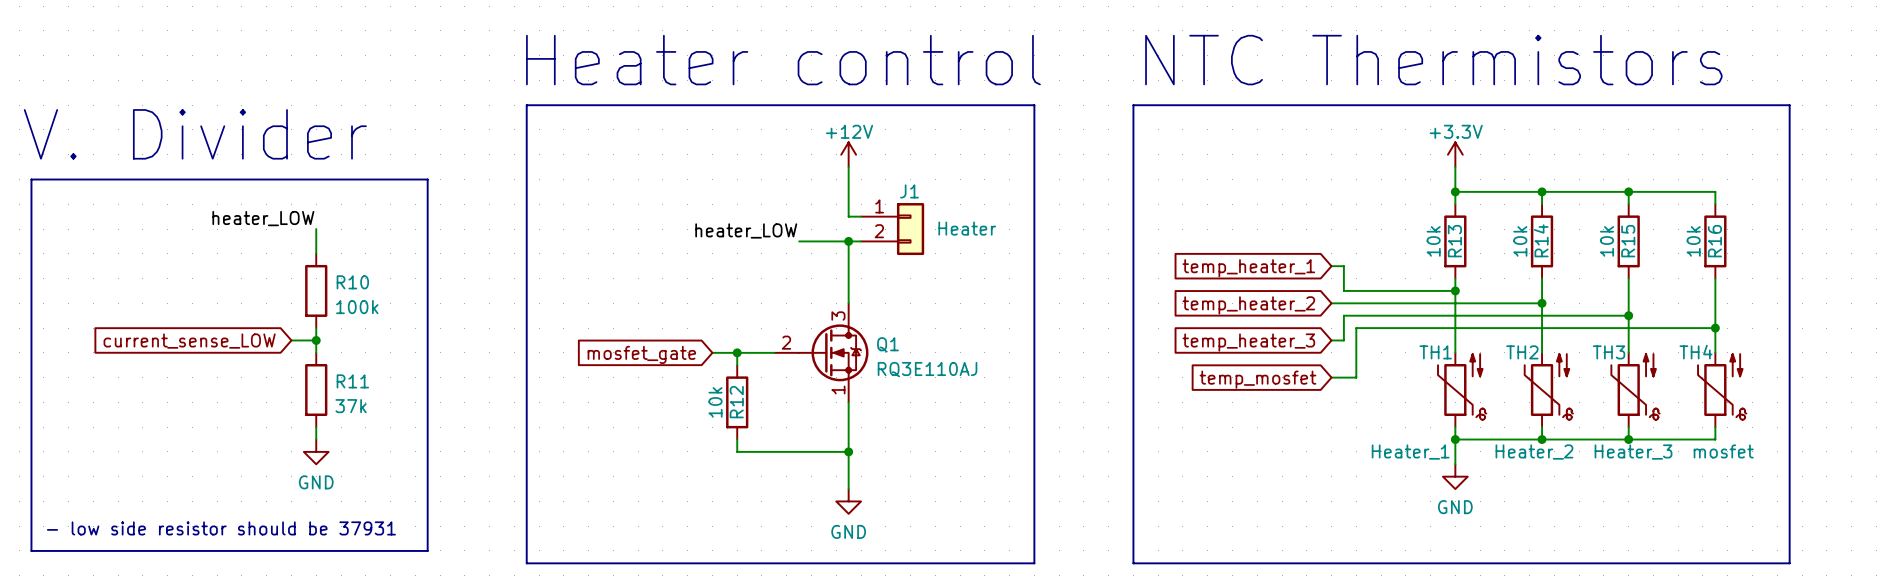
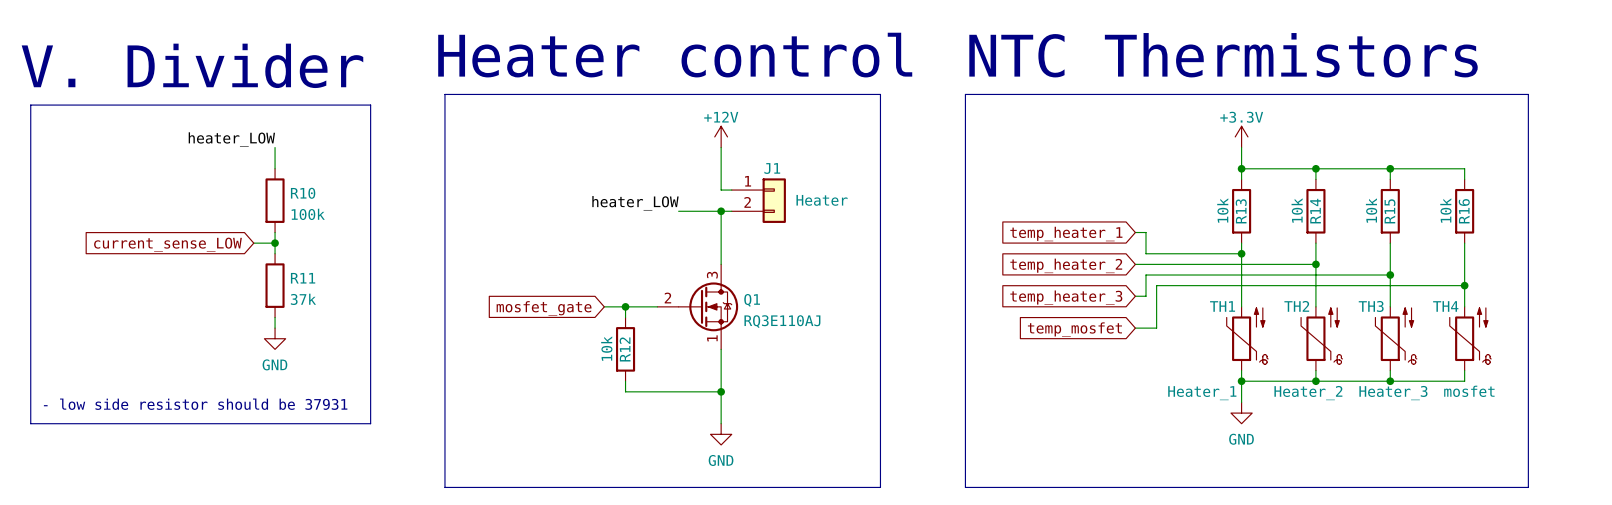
text position: V. Divider (195, 134) -> V. Divider (192, 65)
line: (31, 179) (31, 550) (427, 550) (427, 179) (31, 179) -> (30, 105) (30, 423) (370, 423) (370, 105) (30, 105)
label position: heater_LOW (263, 218) -> heater_LOW (231, 139)
wire: (316, 229) (316, 253) -> (275, 147) (275, 168)
junction: none -> (275, 243)
R10 position: (316, 290) -> (275, 200)
wire: (316, 328) (316, 352) -> (275, 232) (275, 253)
wire: (291, 340) (316, 340) -> (253, 243) (275, 243)
junction: (316, 340) -> none
global label position: current_sense_LOW (189, 341) -> current_sense_LOW (167, 244)
R11 position: (316, 390) -> (275, 285)
wire: (316, 427) (316, 439) -> (275, 317) (275, 328)
power symbol position: GND (316, 451) -> GND (275, 338)
text position: - low side resistor should be 37931 (221, 528) -> - low side resistor should be 37931 (195, 404)

